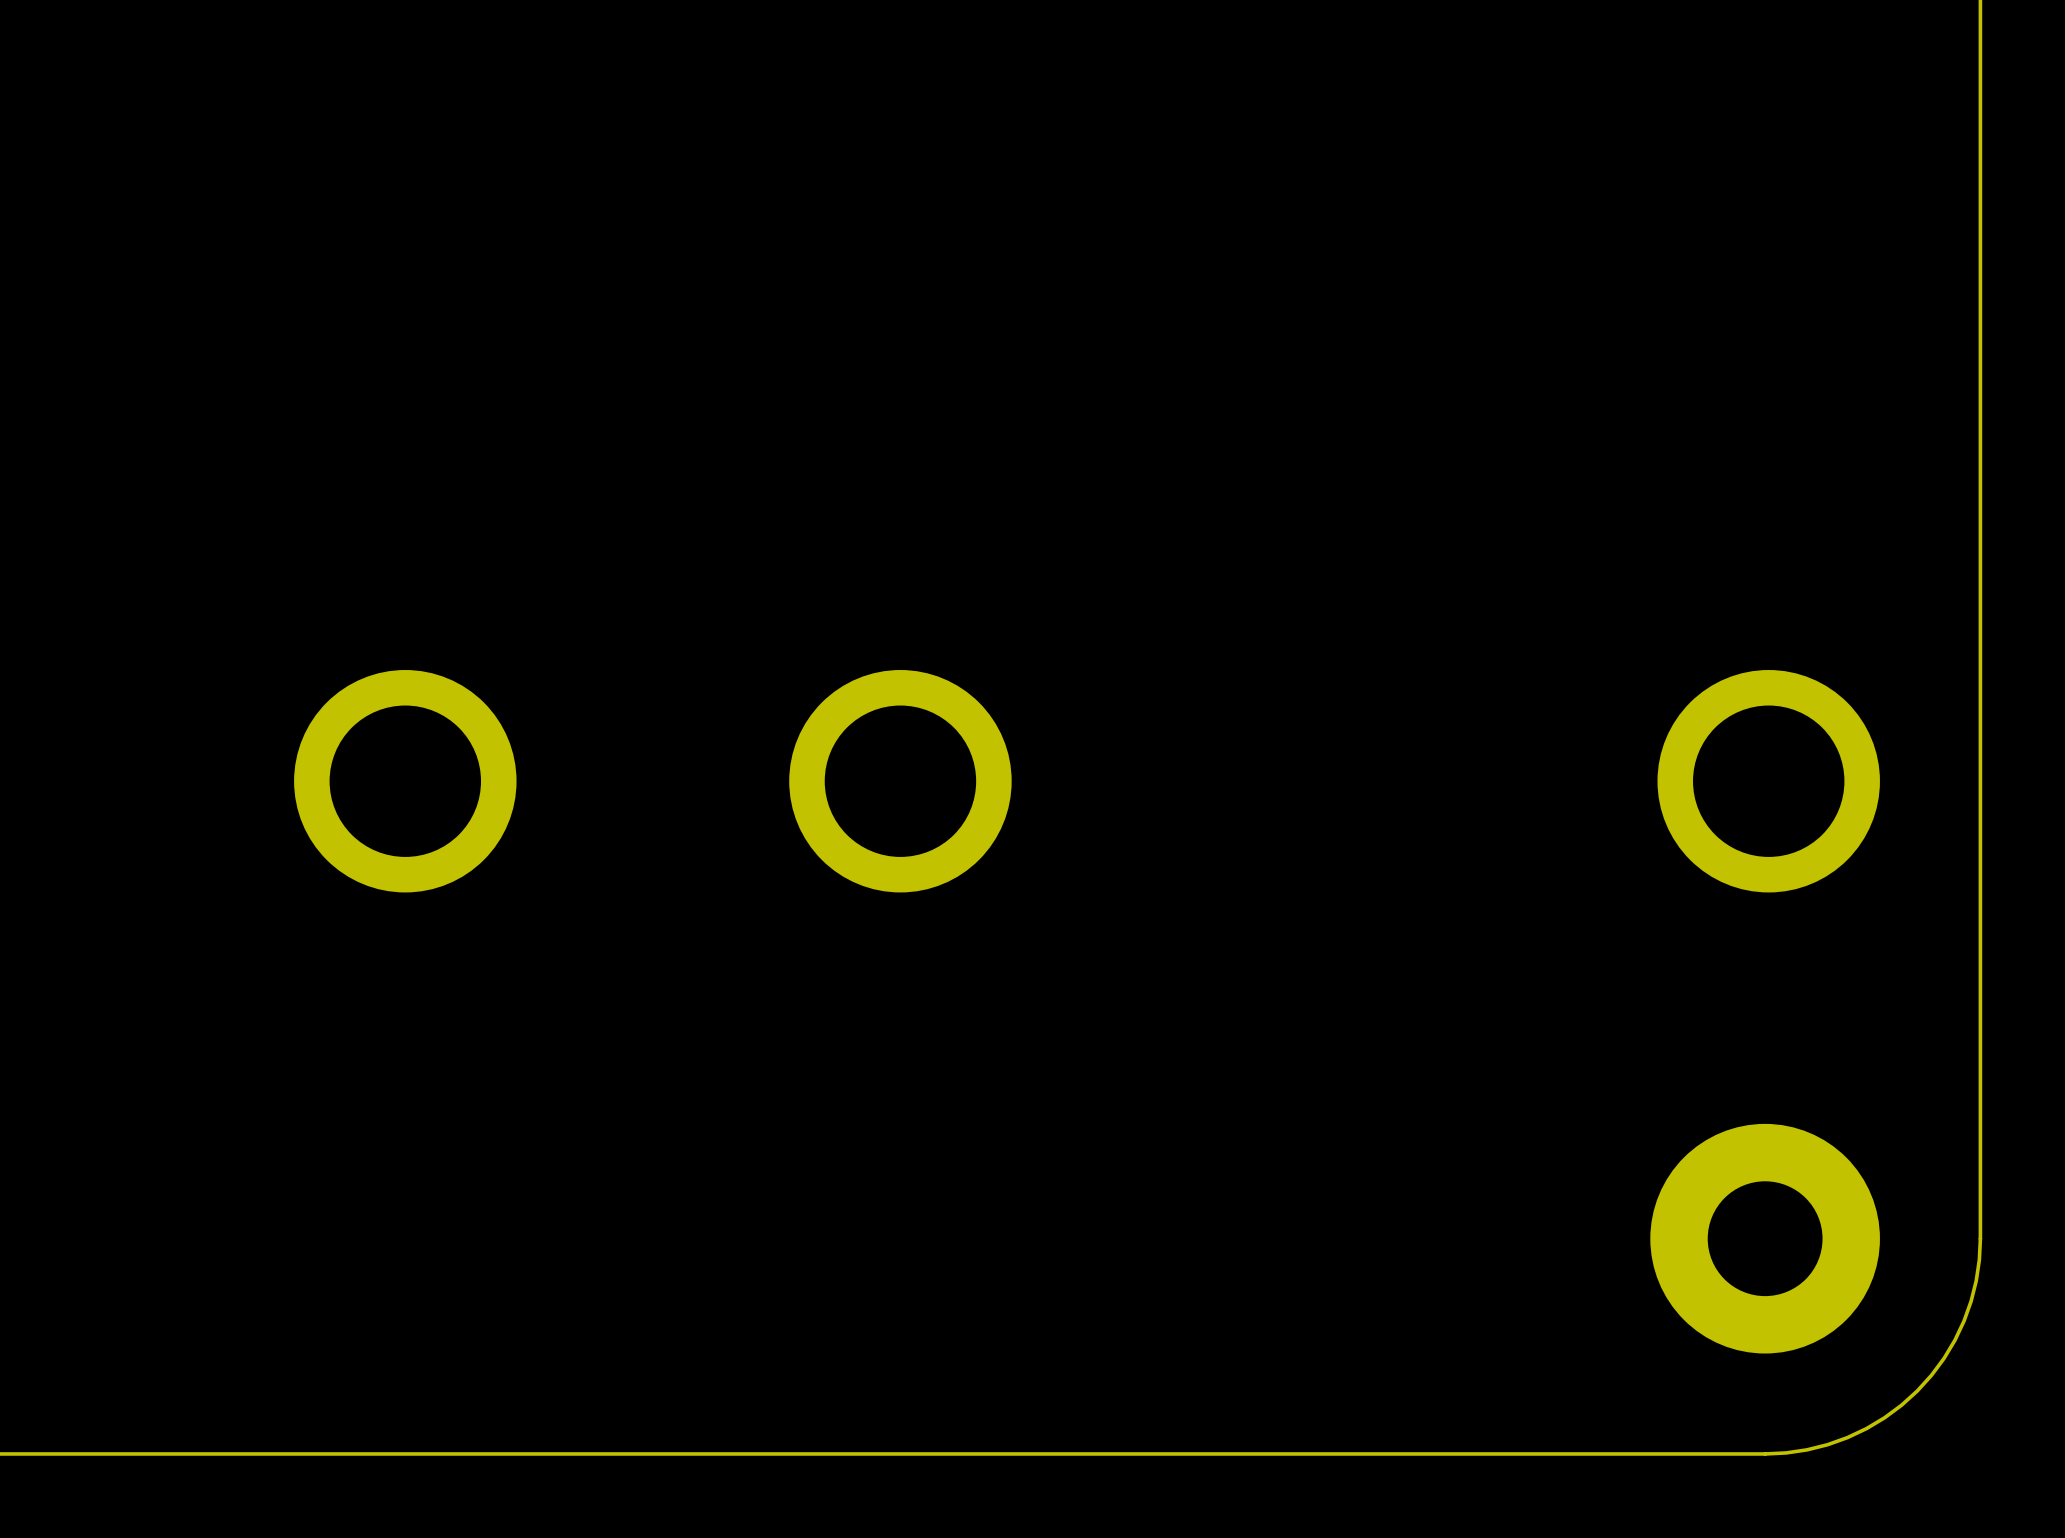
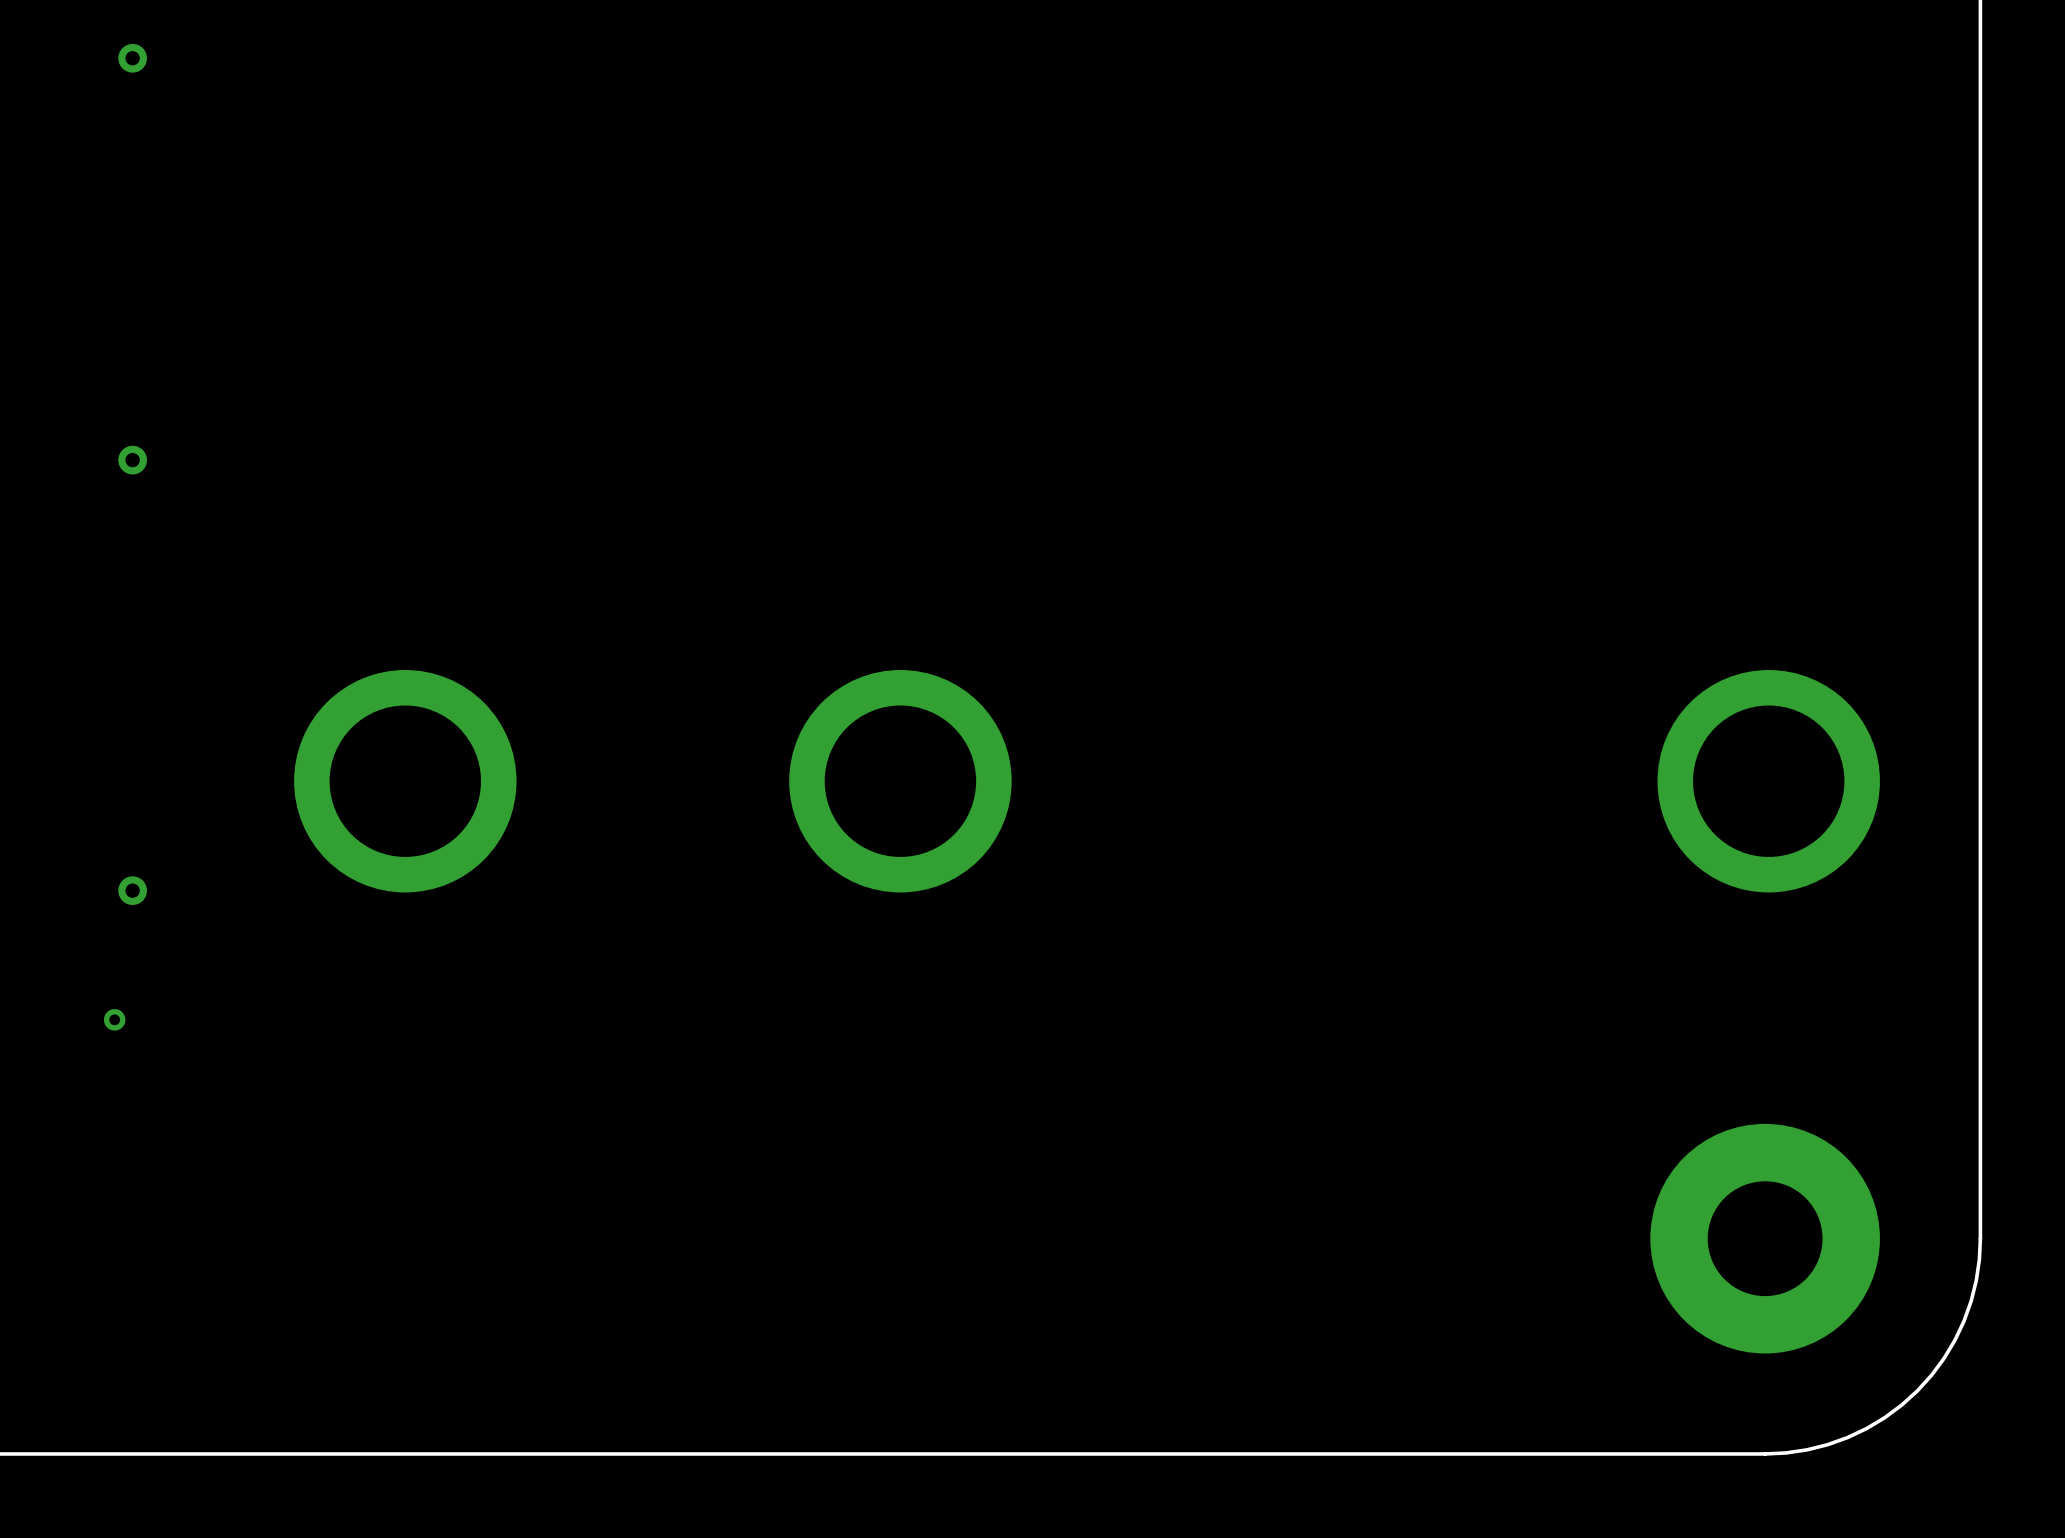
via: none -> (132, 58)
via: none -> (132, 460)
via: none -> (132, 890)
via: none -> (114, 1019)

